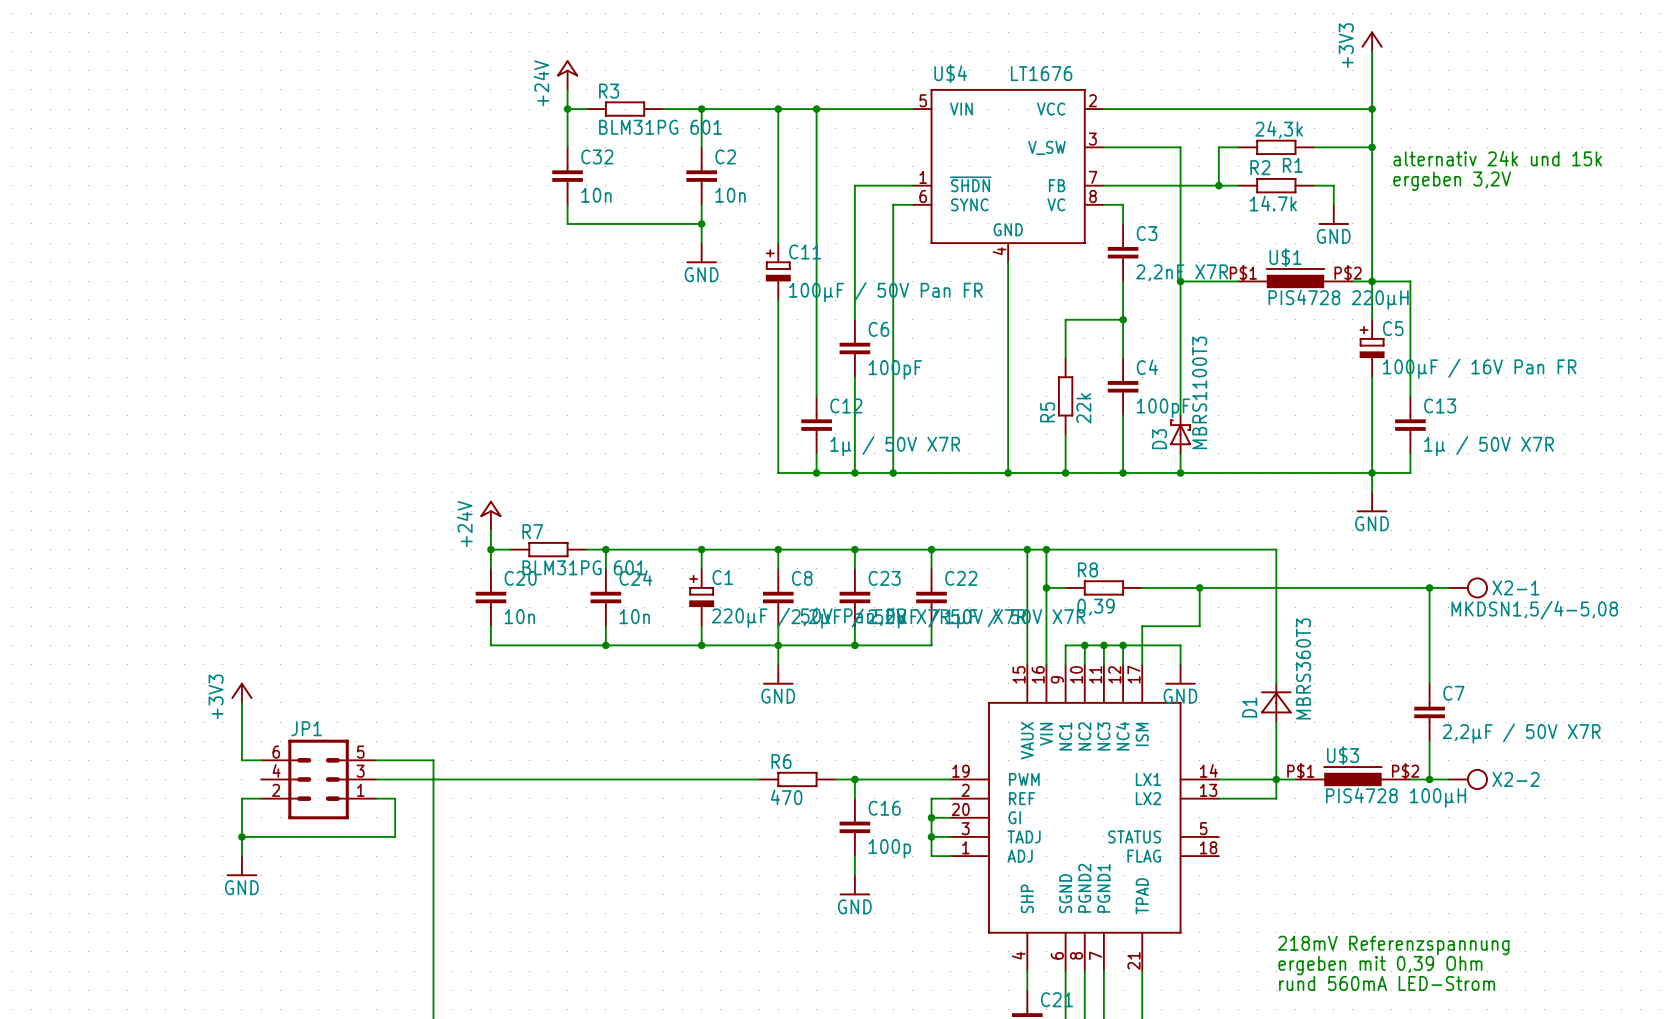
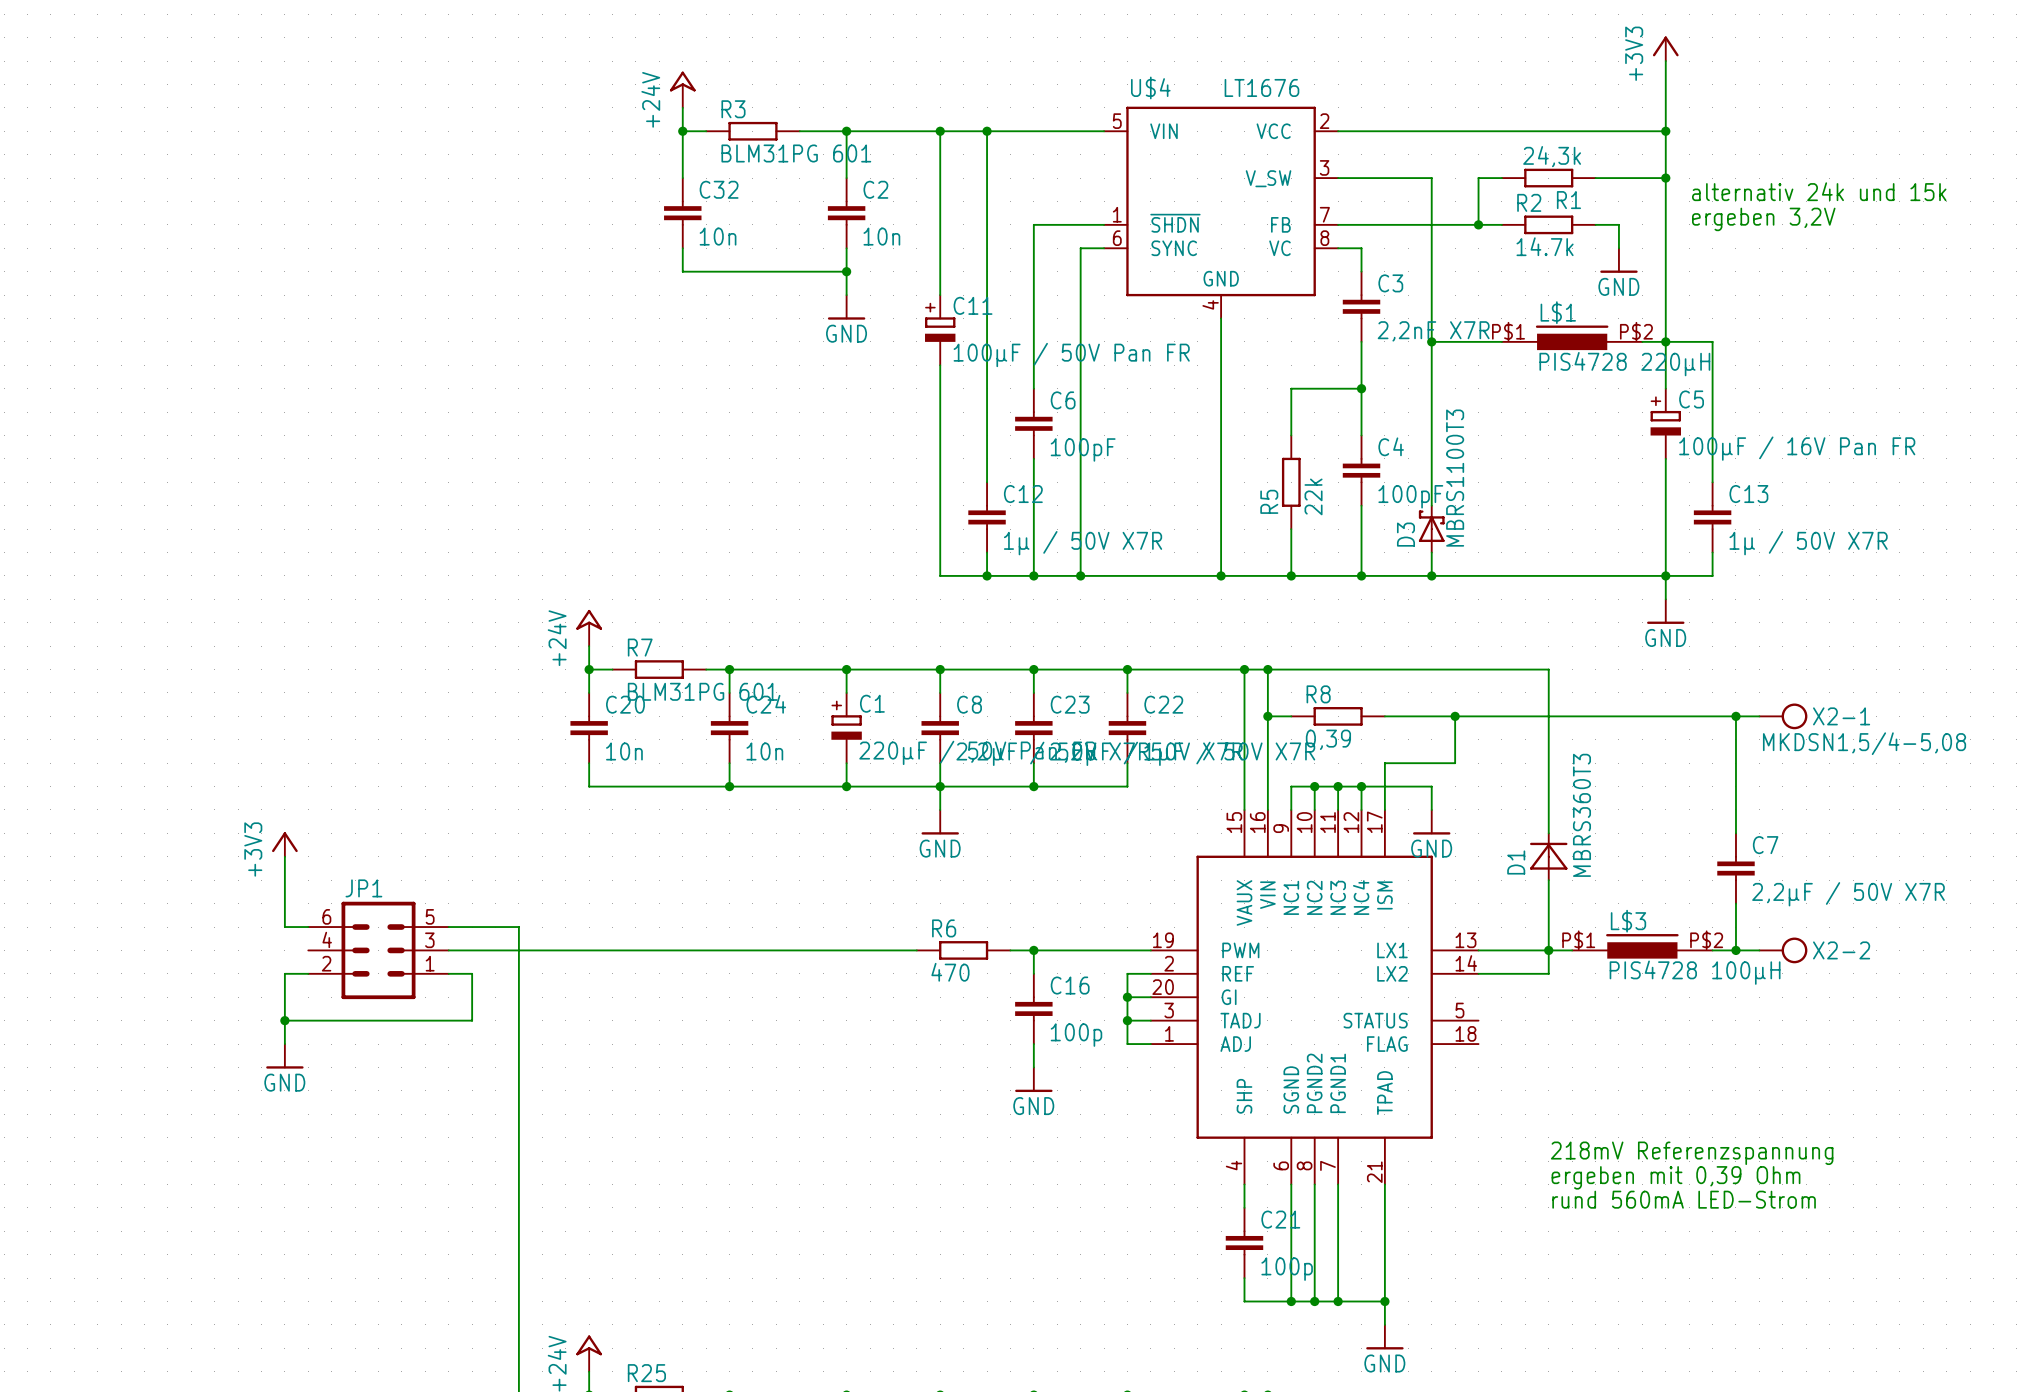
U$1 name: U$1 (1285, 257) -> L$1 (1558, 312)
U$3 name: U$3 (1343, 755) -> L$3 (1628, 921)
part pin number: 14 (1208, 770) -> 13 (1465, 940)
part pin number: 13 (1208, 790) -> 14 (1466, 963)

